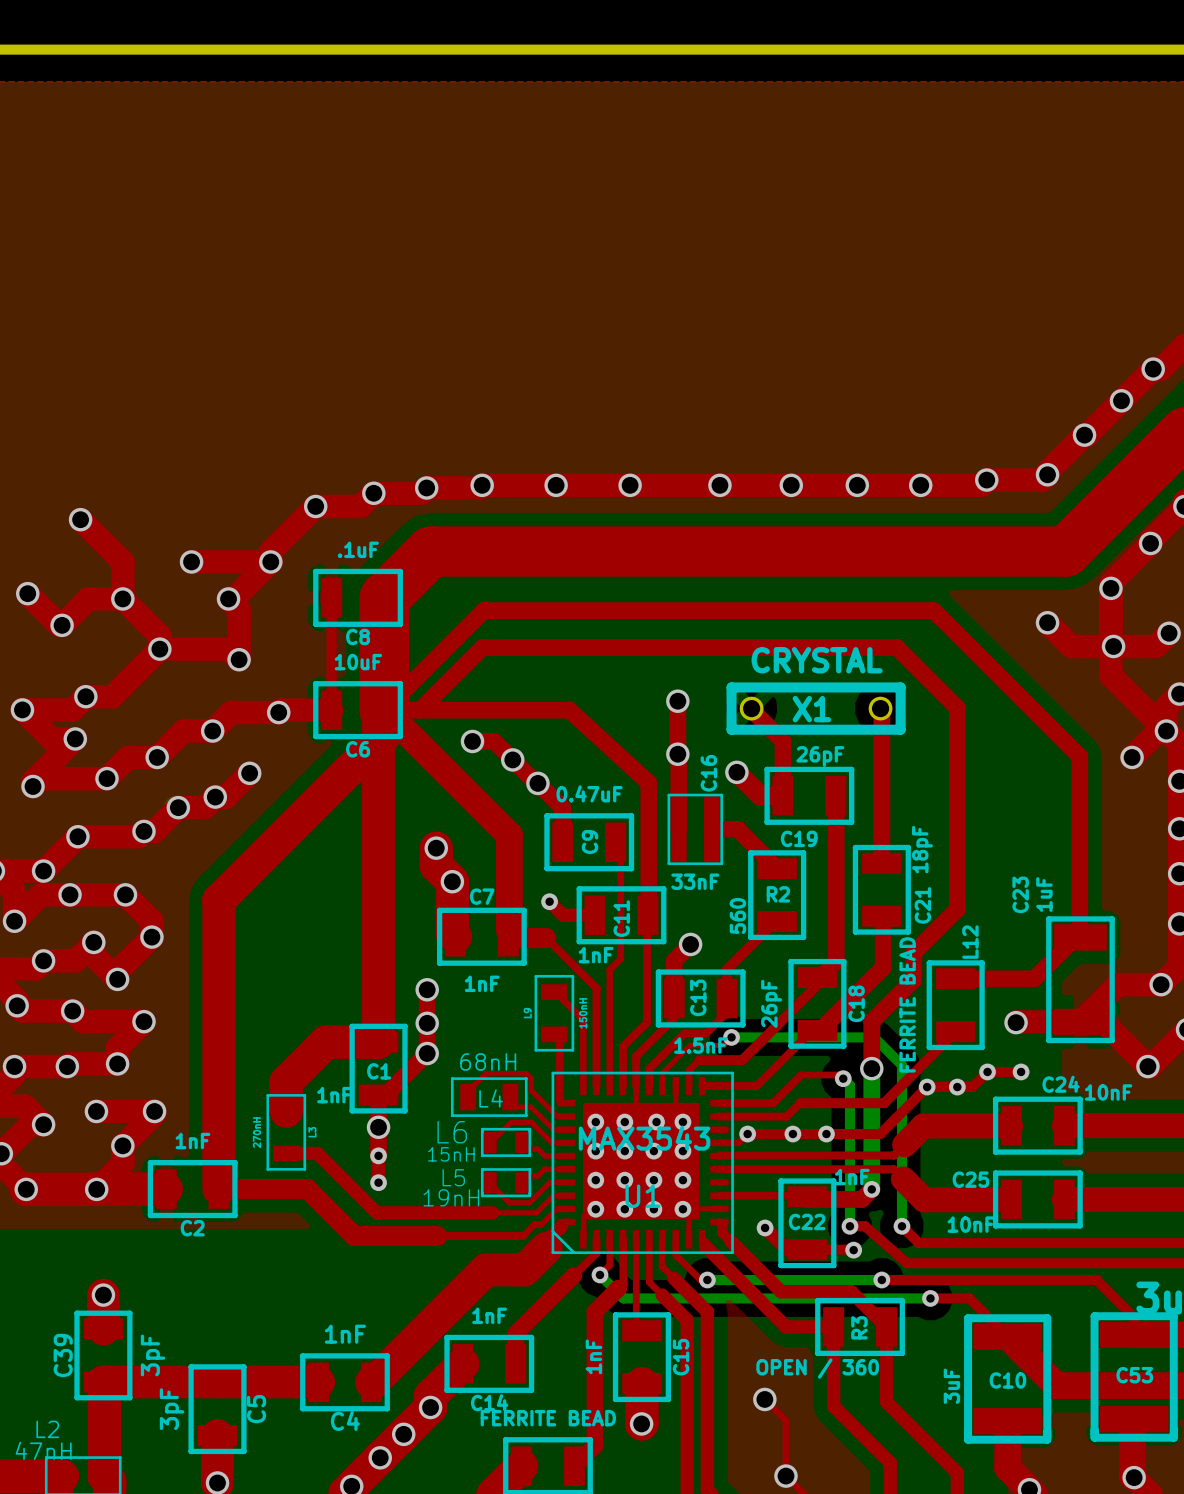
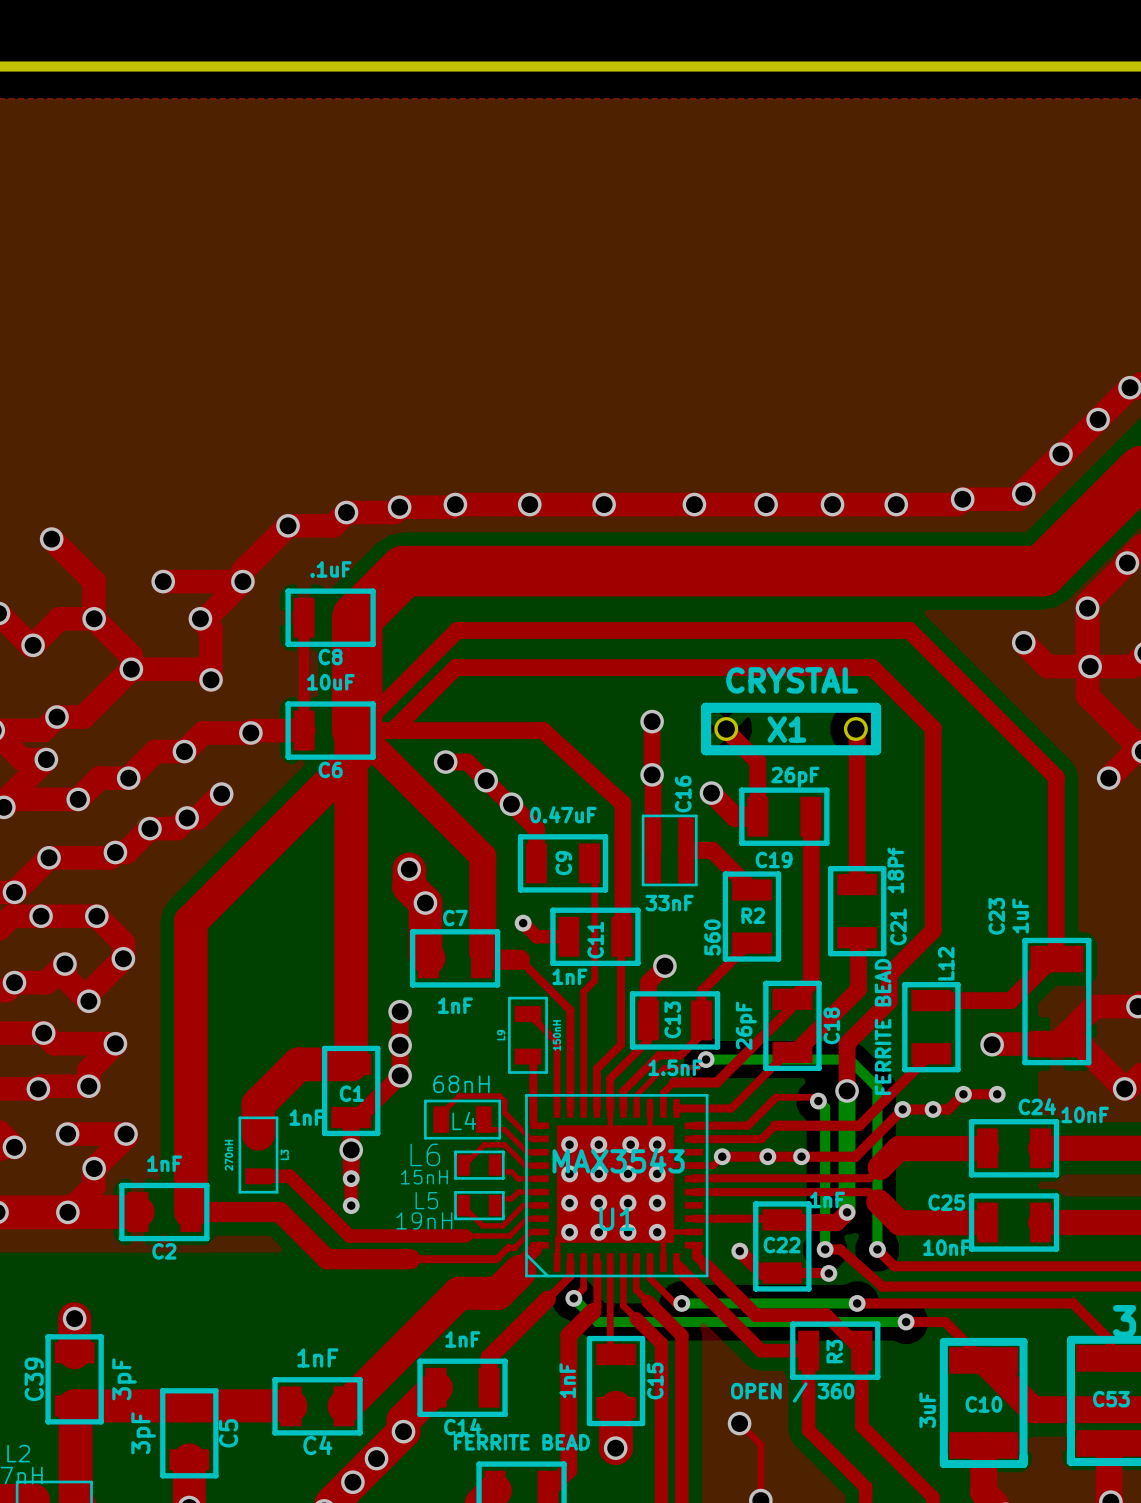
C21 value: 18pF (922, 849) -> 18Pf (895, 870)

